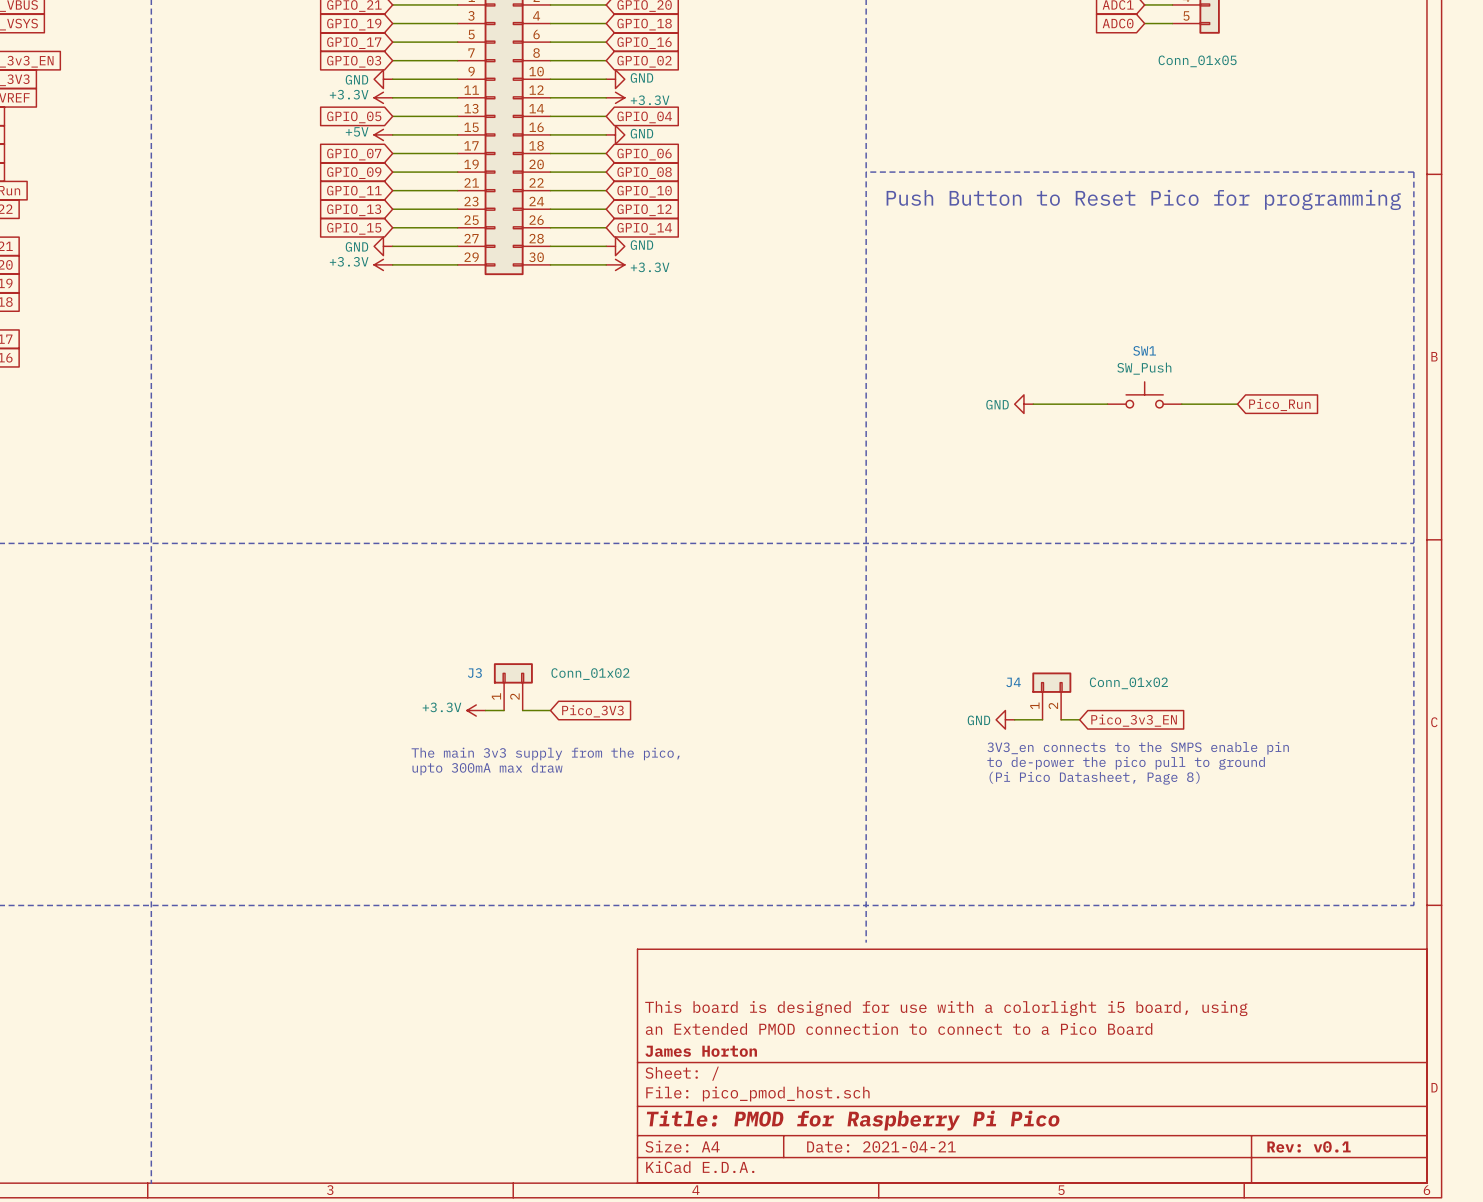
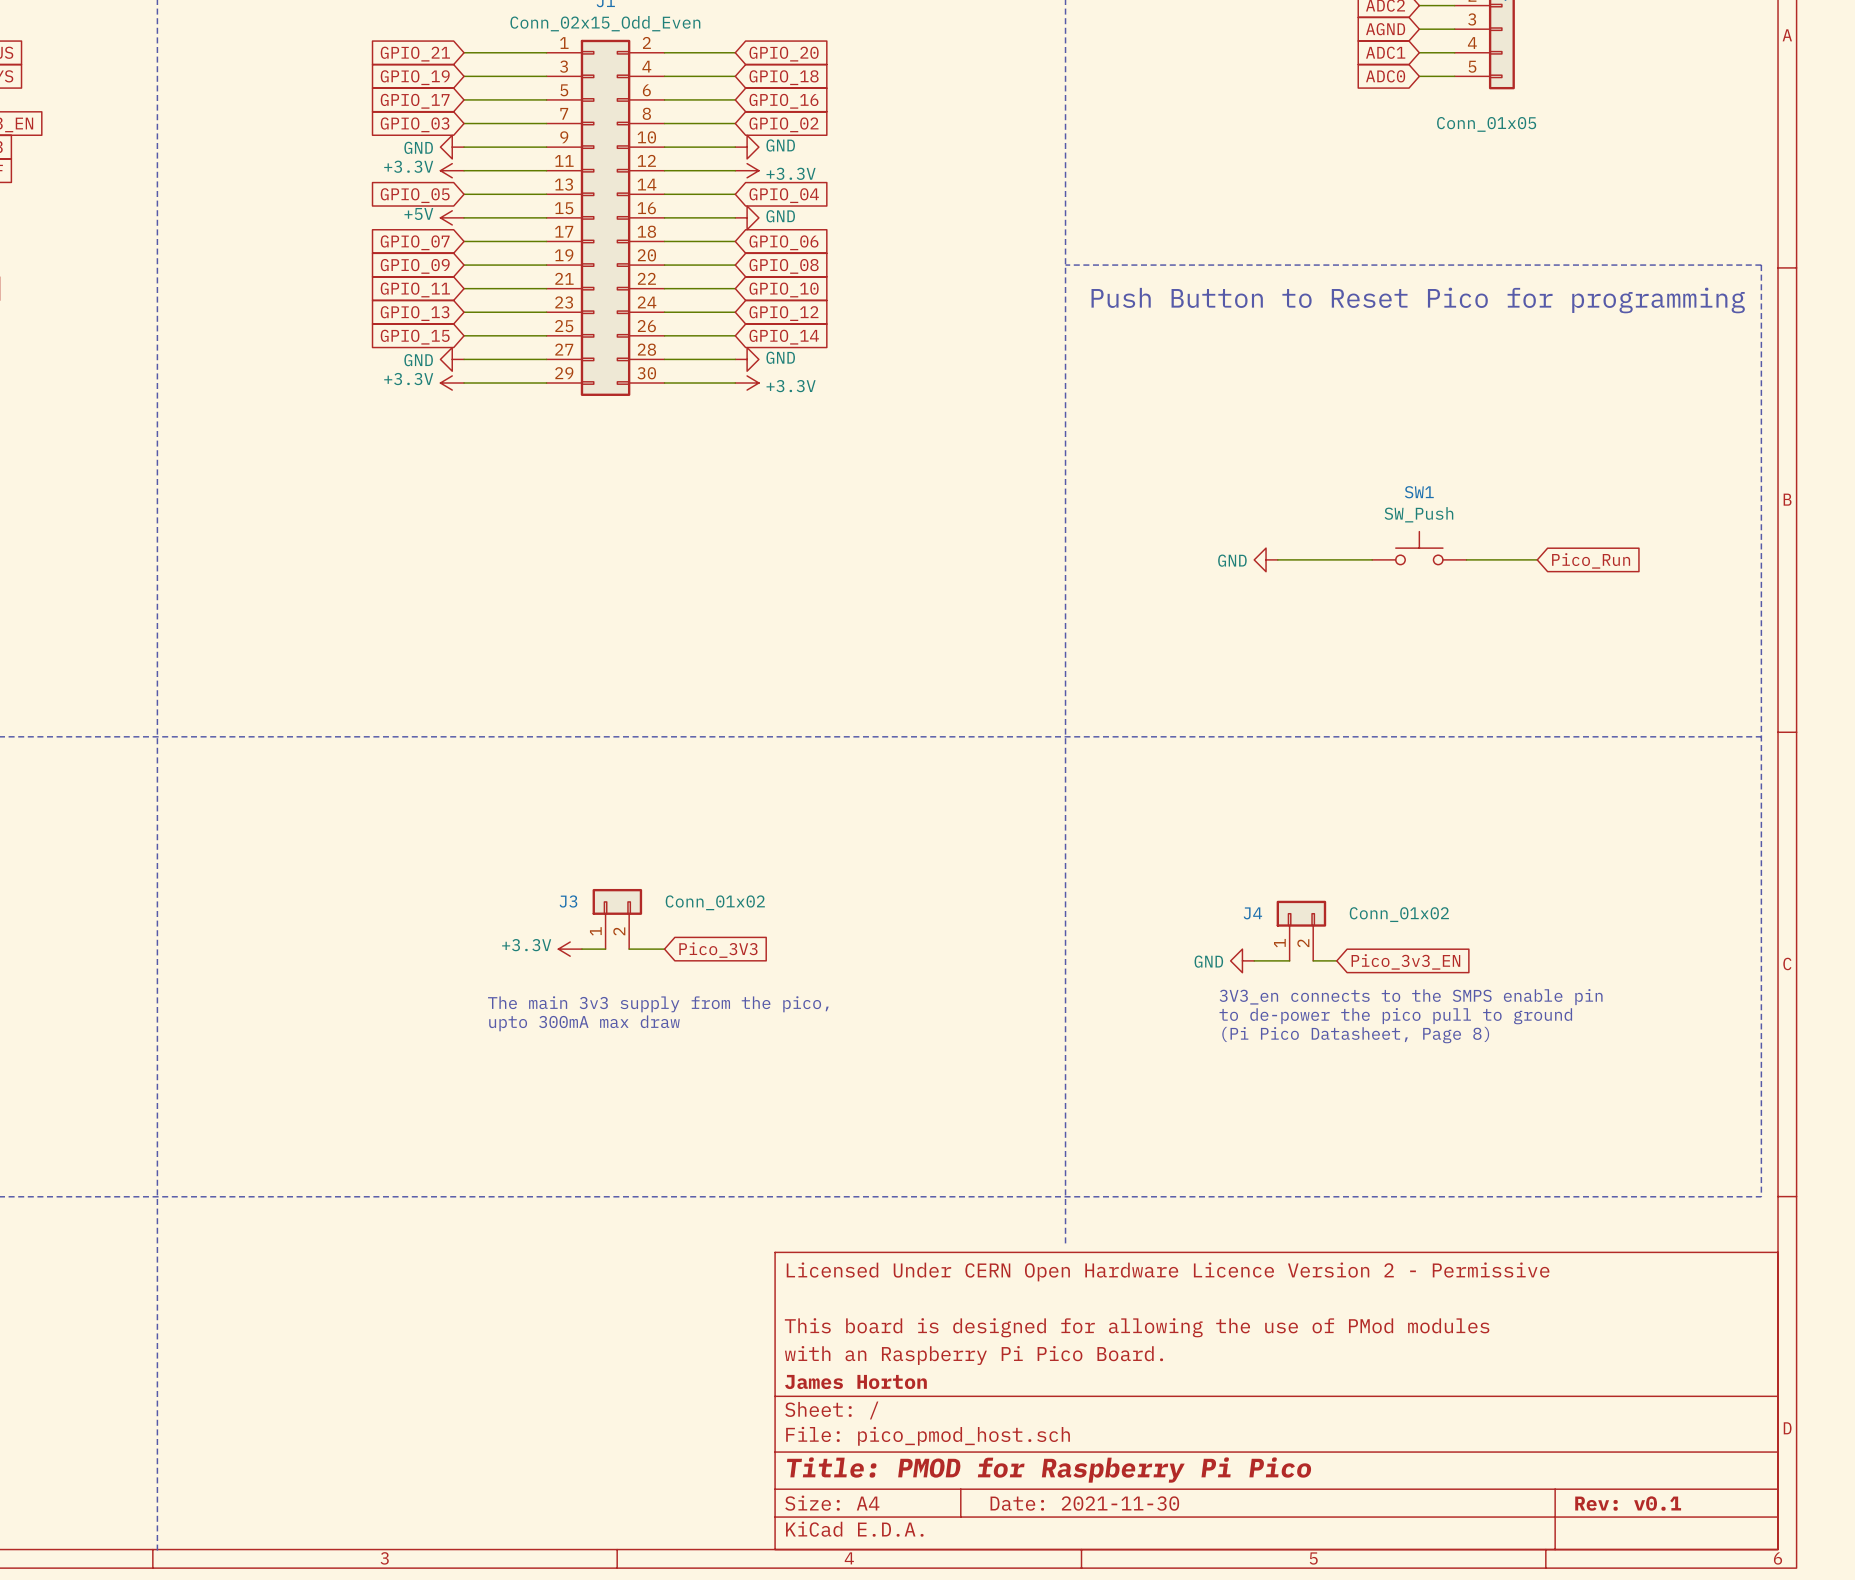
title block: none -> Licensed Under CERN Open Hardware Licence Version 2 - Permissive (1168, 1271)
title block: This board is designed for use with a colorlight i5 board, using (946, 1008) -> This board is designed for allowing the use of PMod modules (1137, 1327)
title block: an Extended PMOD connection to connect to a Pico Board (899, 1028) -> with an Raspberry Pi Pico Board. (973, 1355)
title block: Date: 2021-04-21 (881, 1146) -> Date: 2021-11-30 (1084, 1503)

